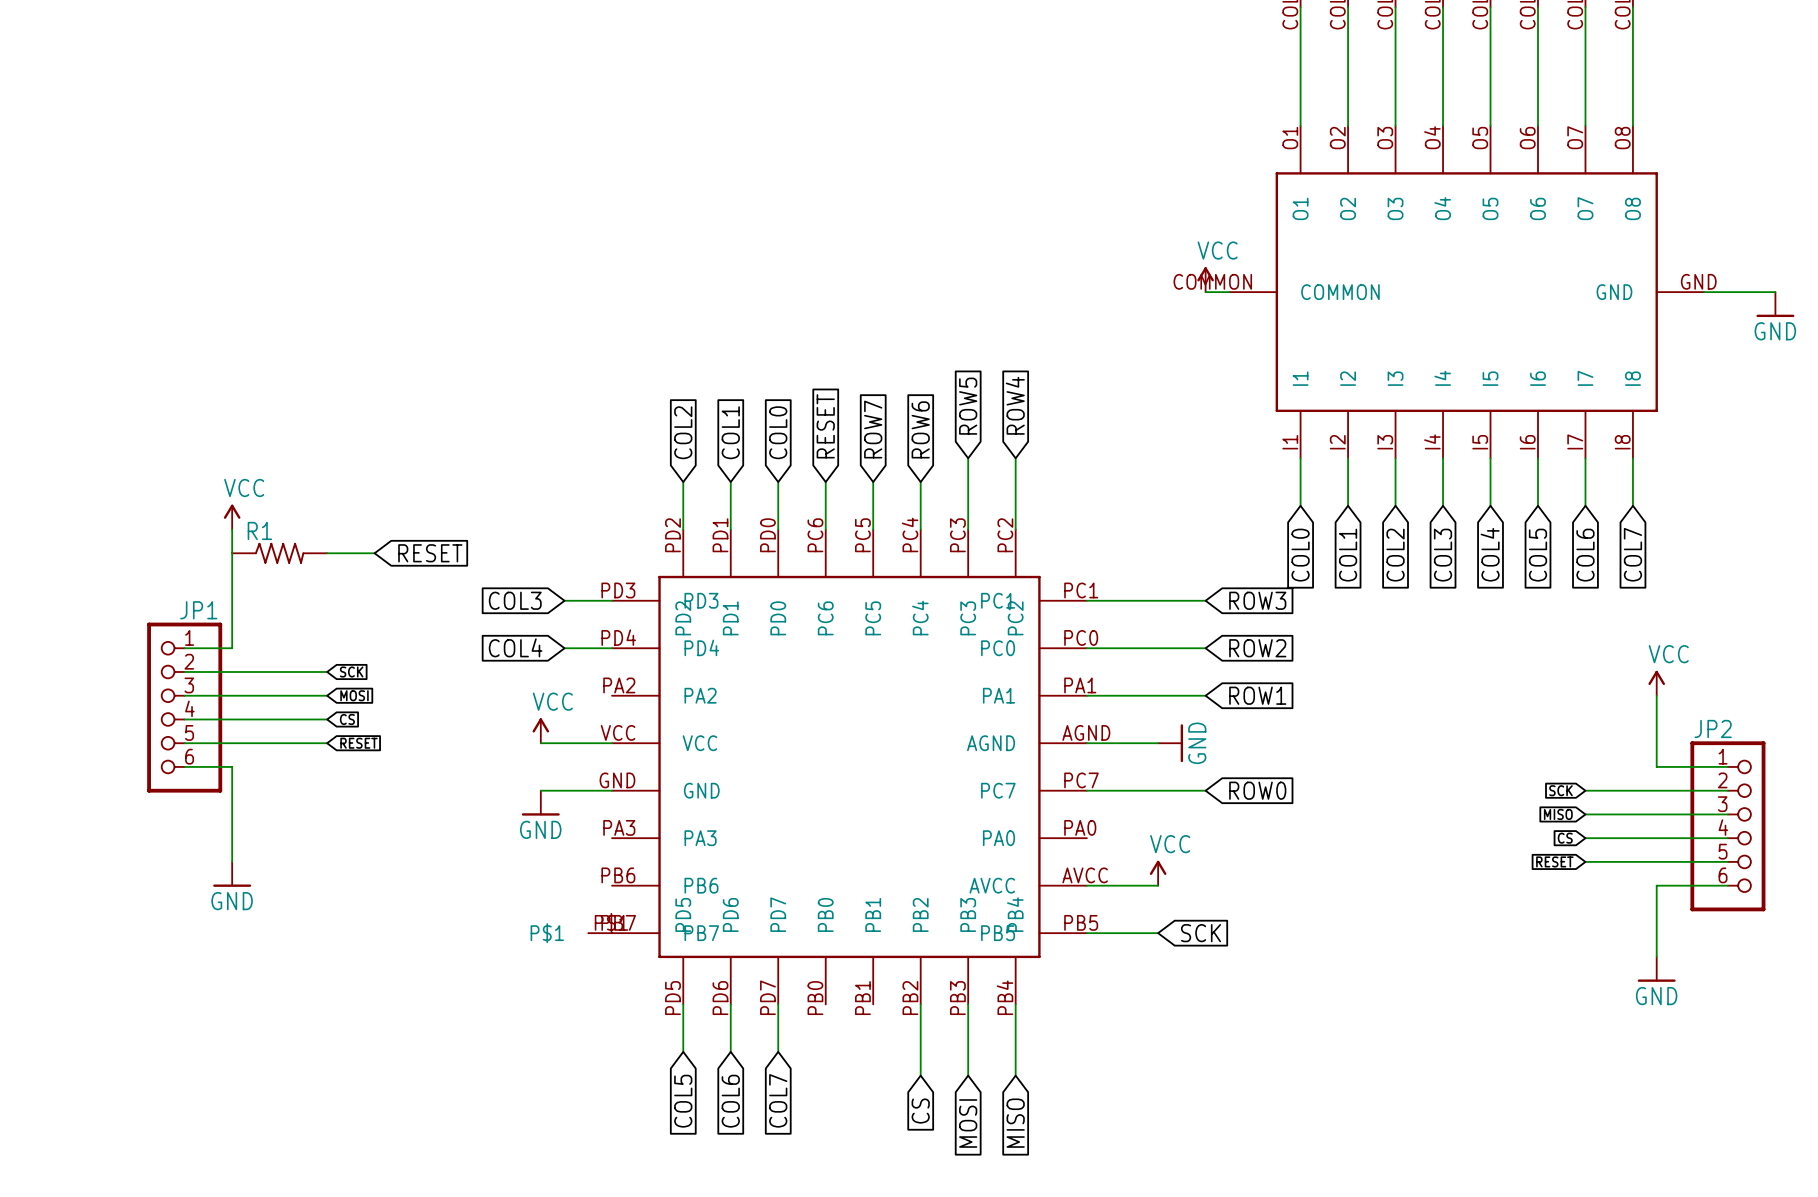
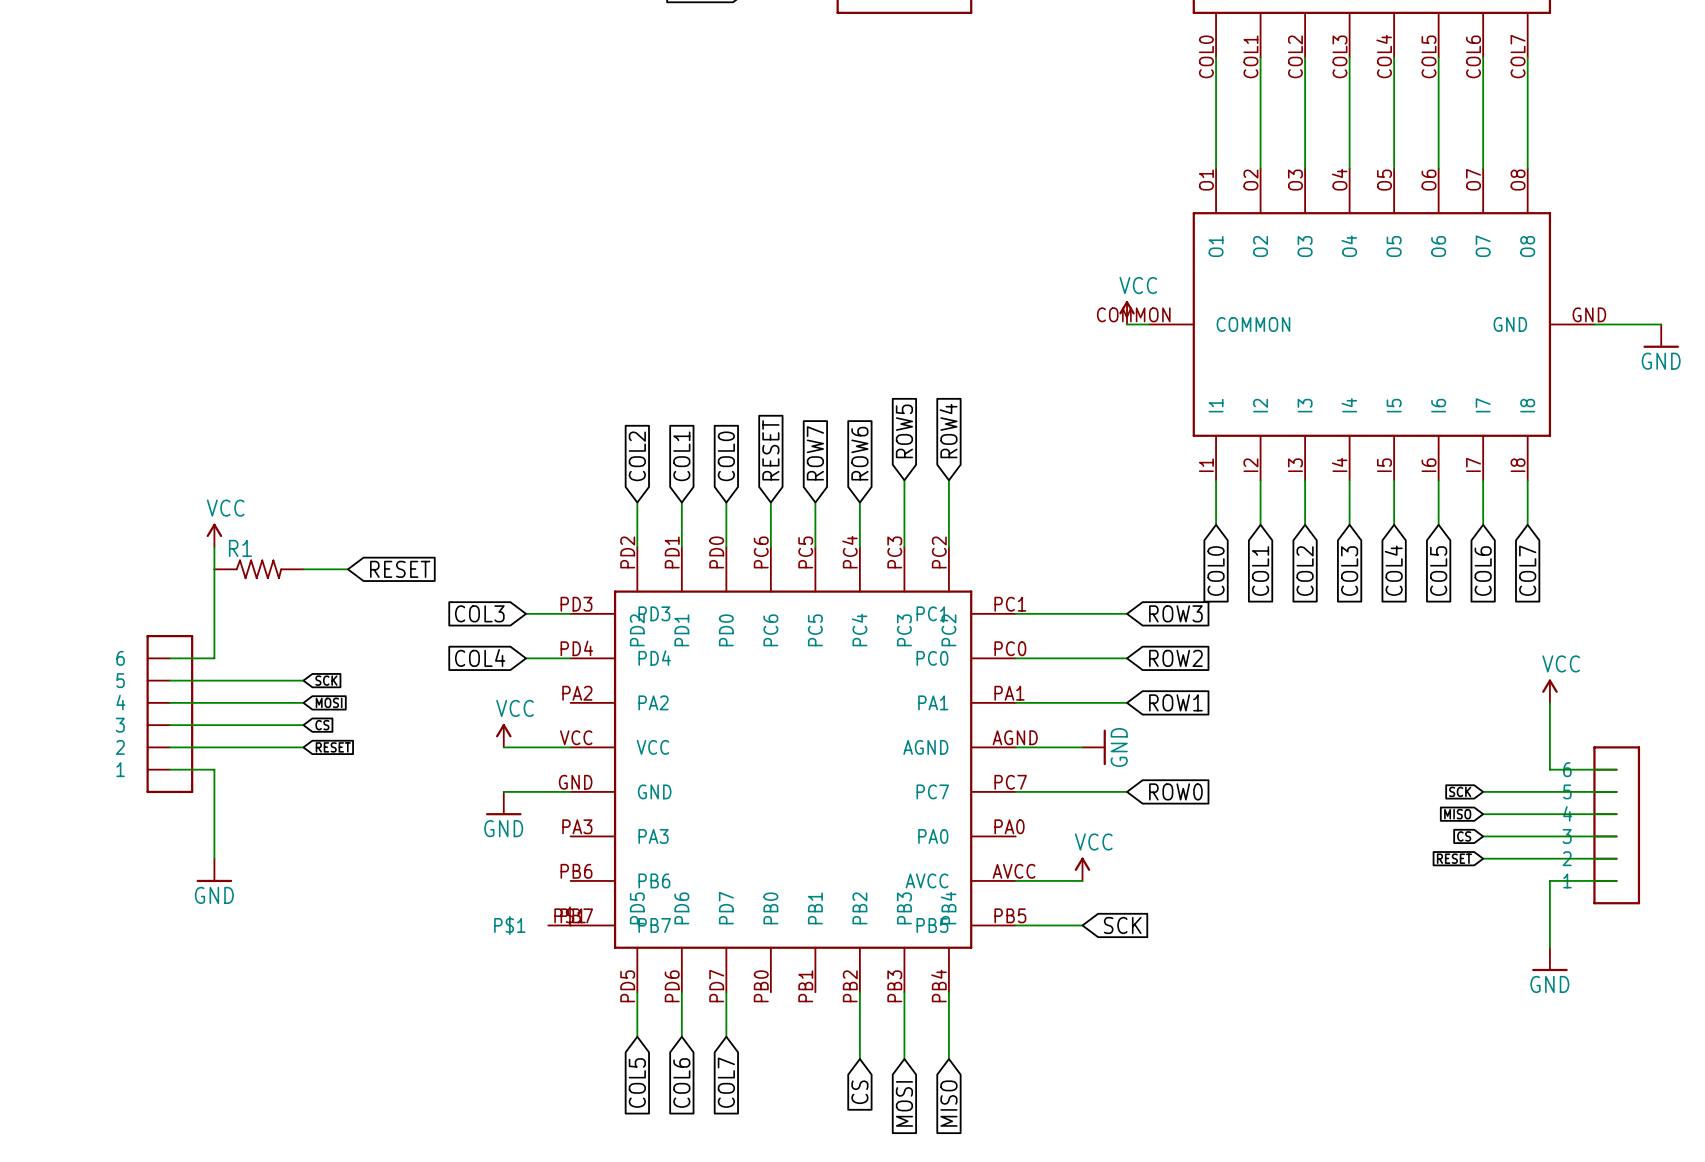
JP1: (184, 707) -> none
part: none -> (169, 714)
JP2: (1727, 826) -> none
part: none -> (1616, 825)

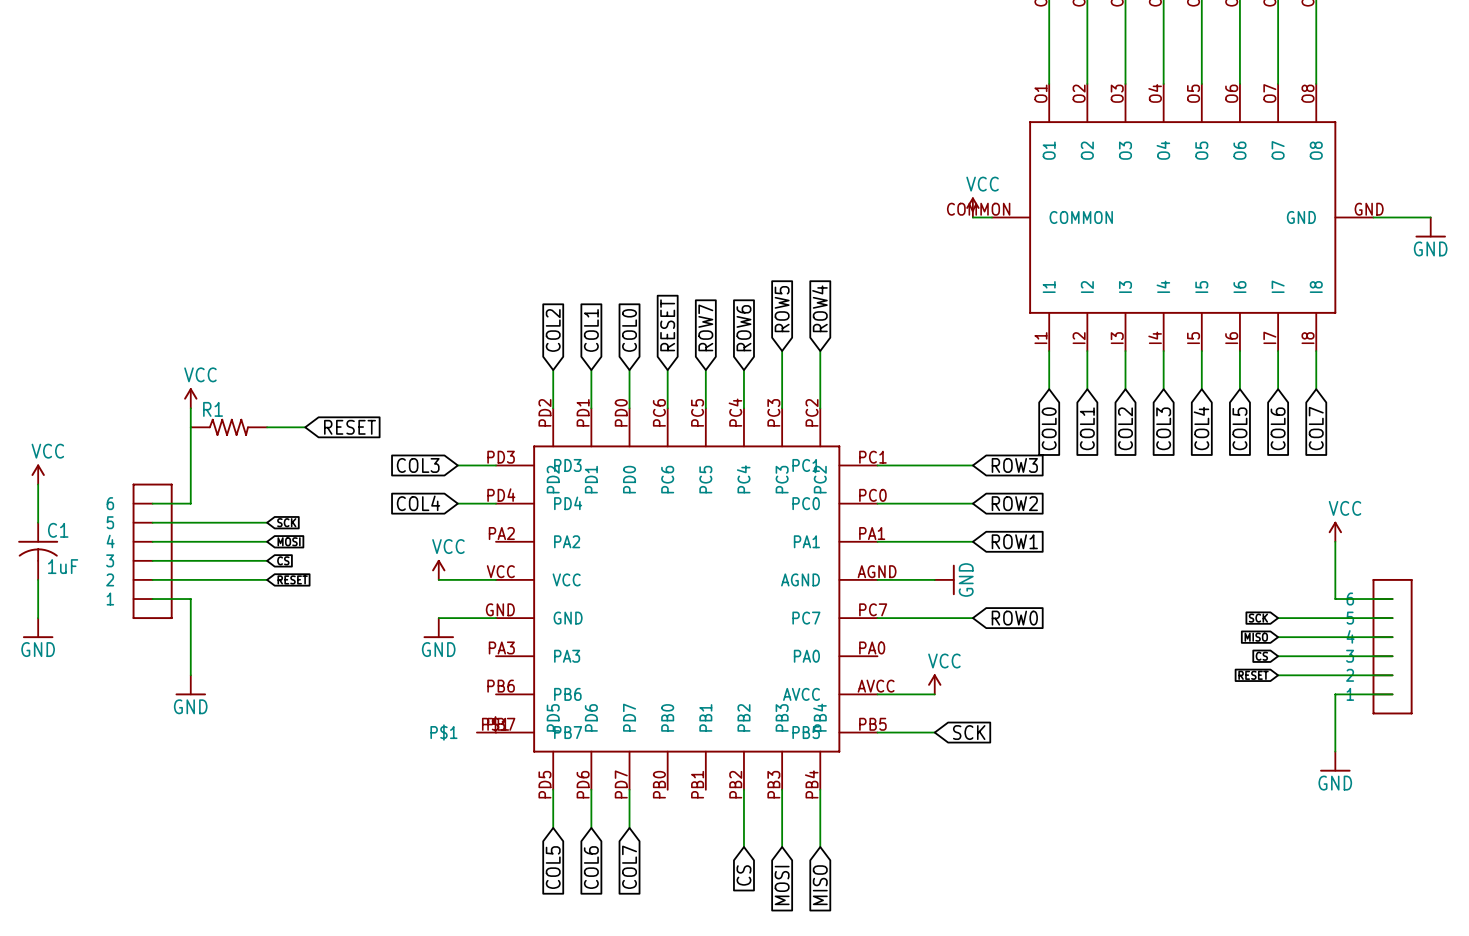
power symbol: none -> VCC (38, 474)
wire: none -> (38, 484) (38, 522)
C1: none -> 1uF (38, 551)
wire: none -> (38, 579) (38, 618)
power symbol: none -> GND (38, 628)

